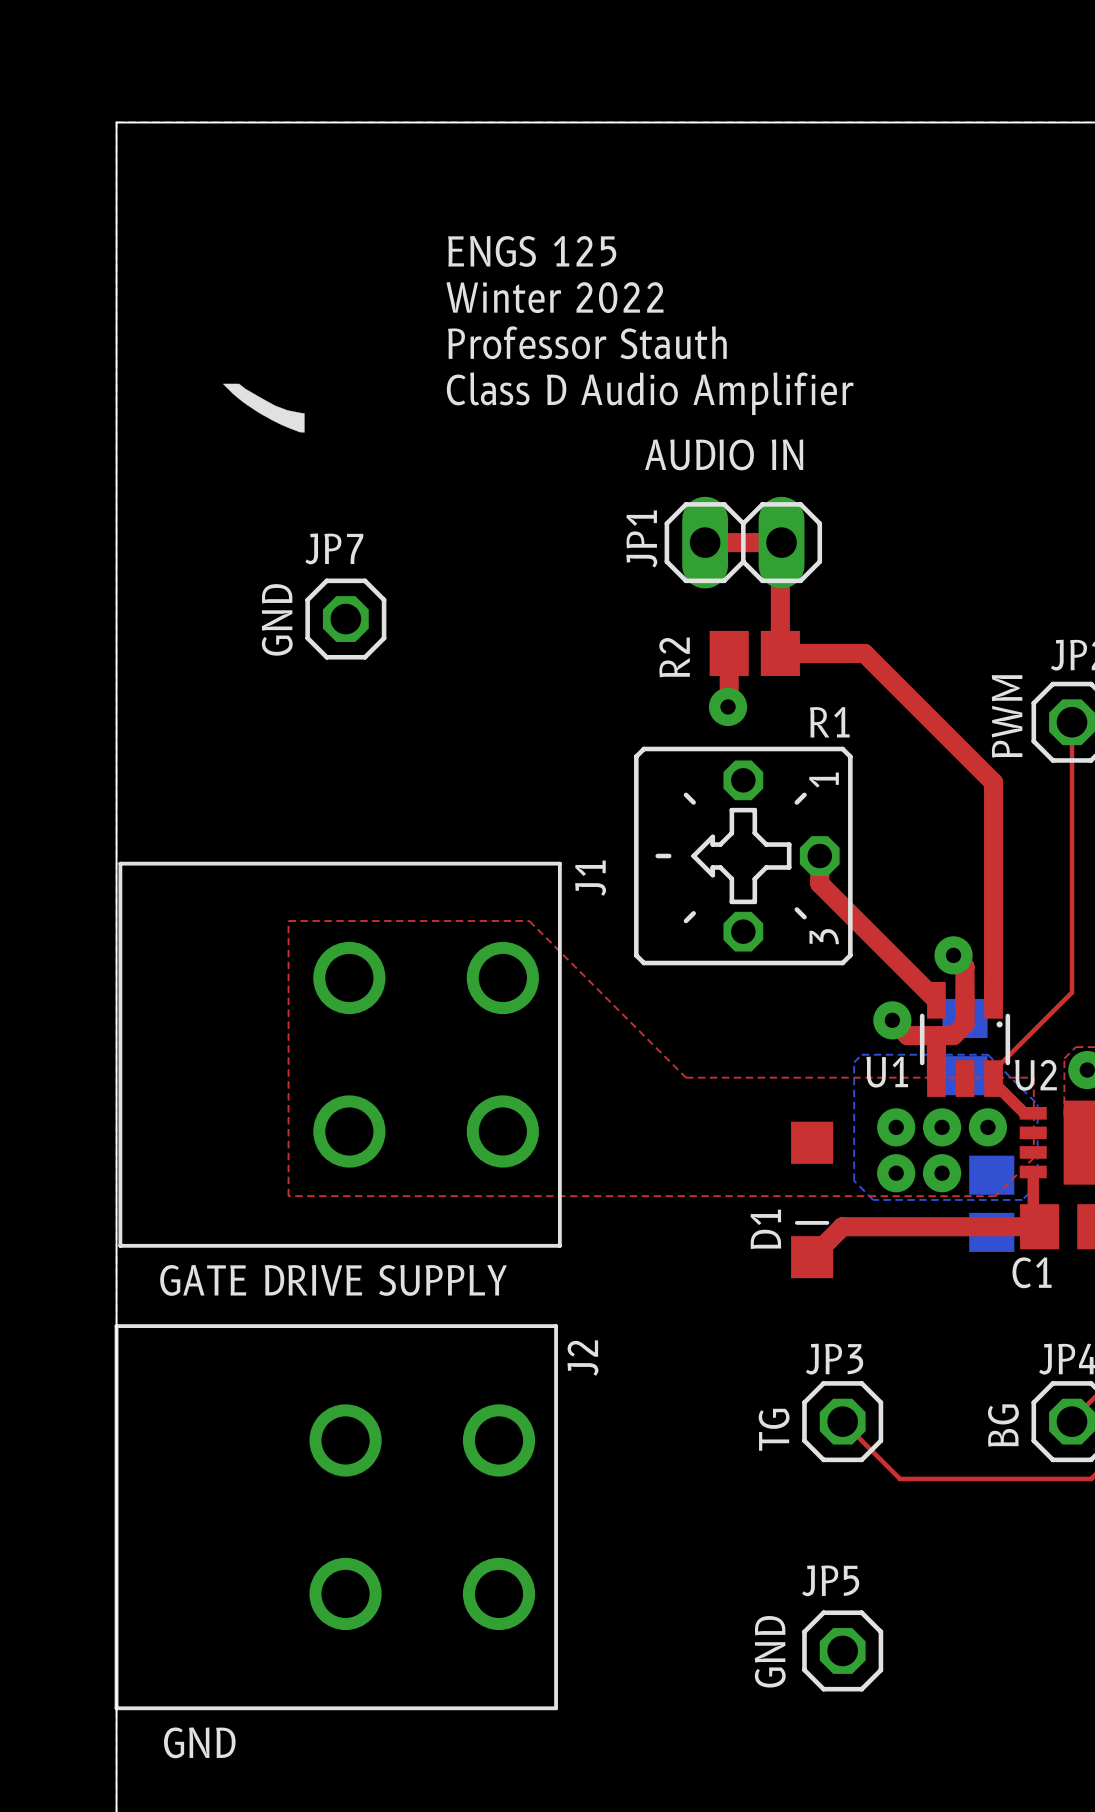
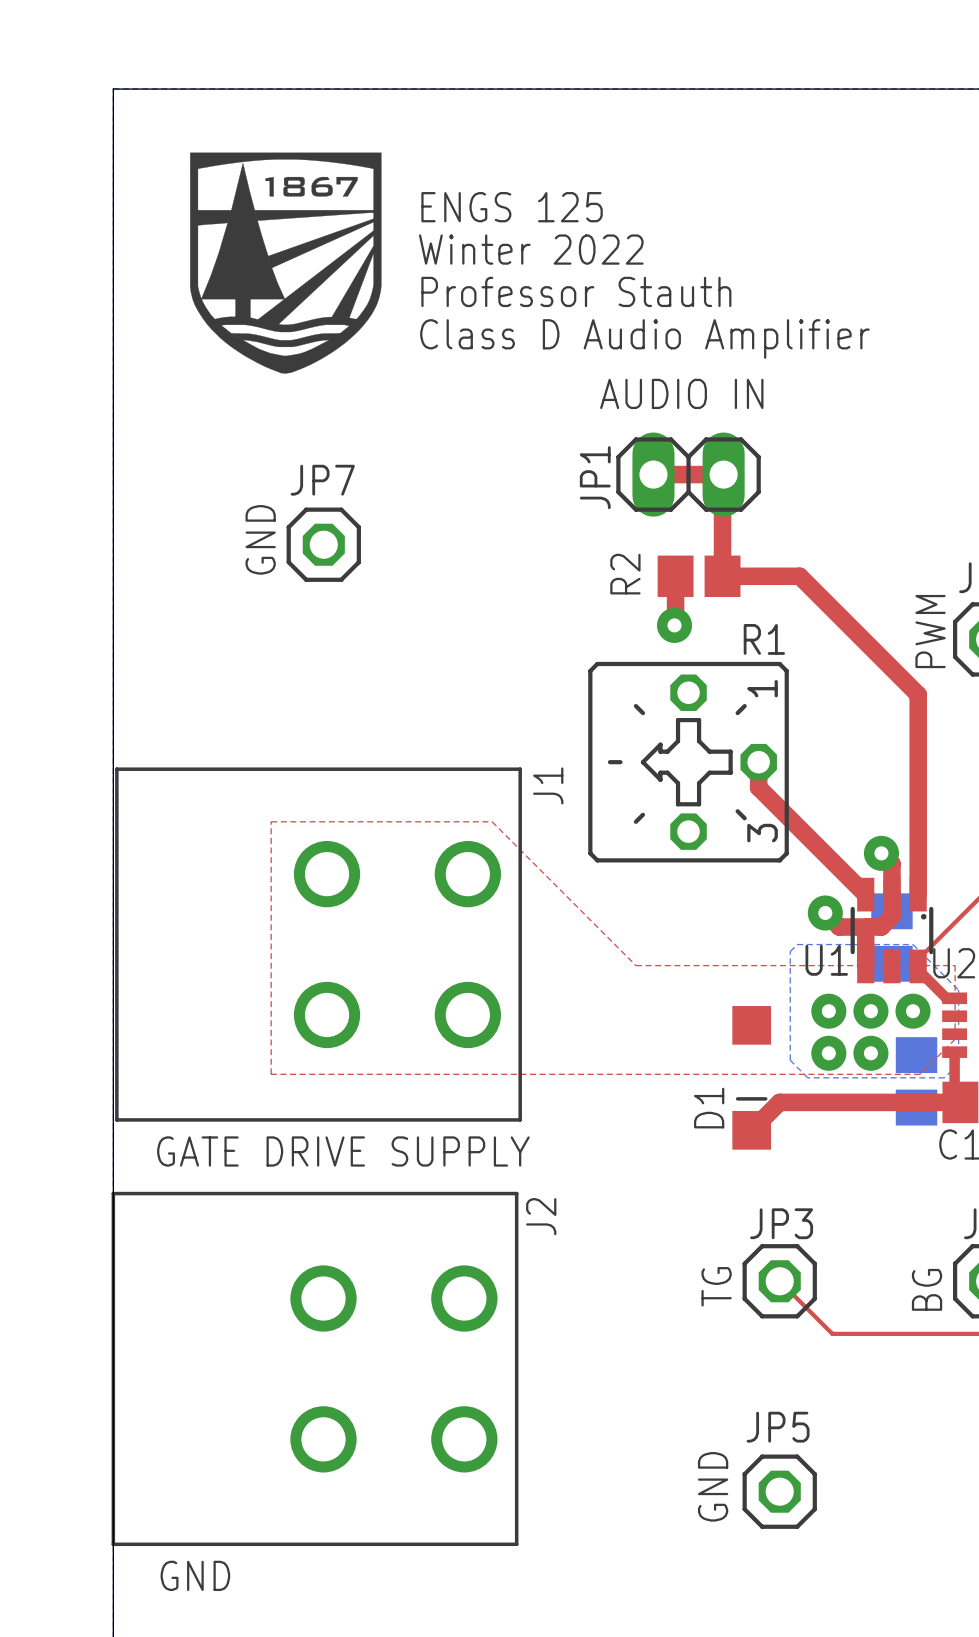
drawing: none -> [190, 152, 382, 374]
drawing: [223, 383, 305, 433] -> none

